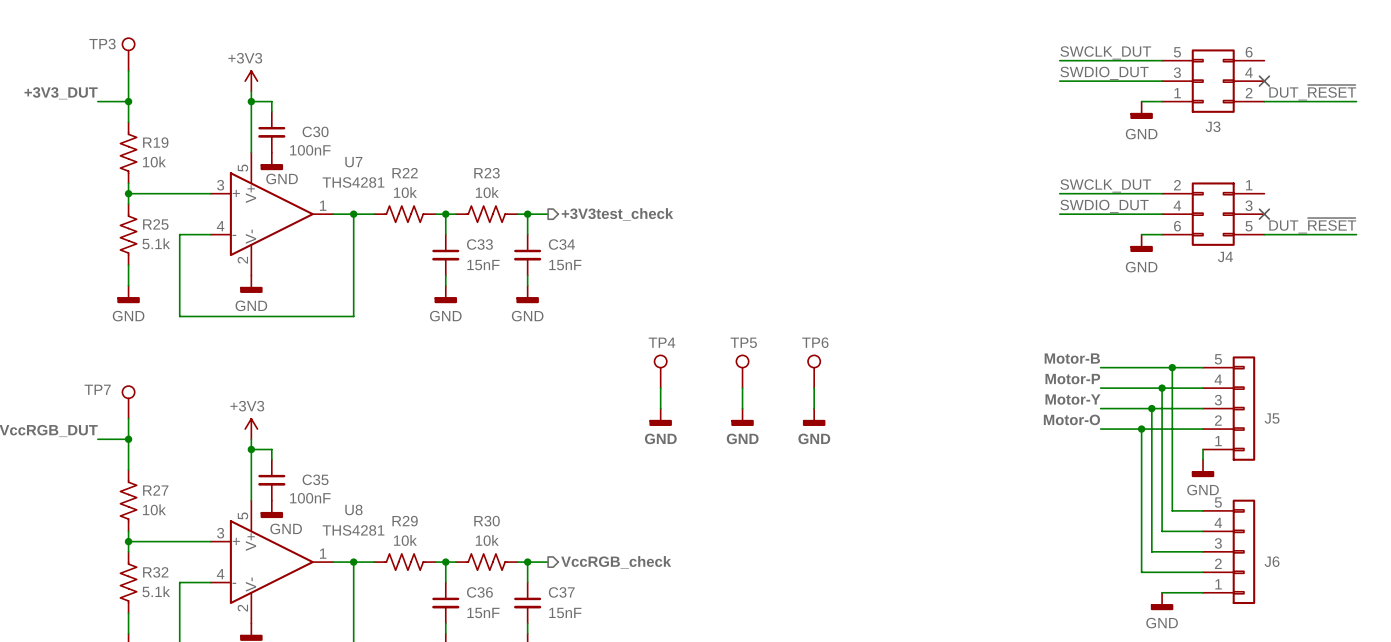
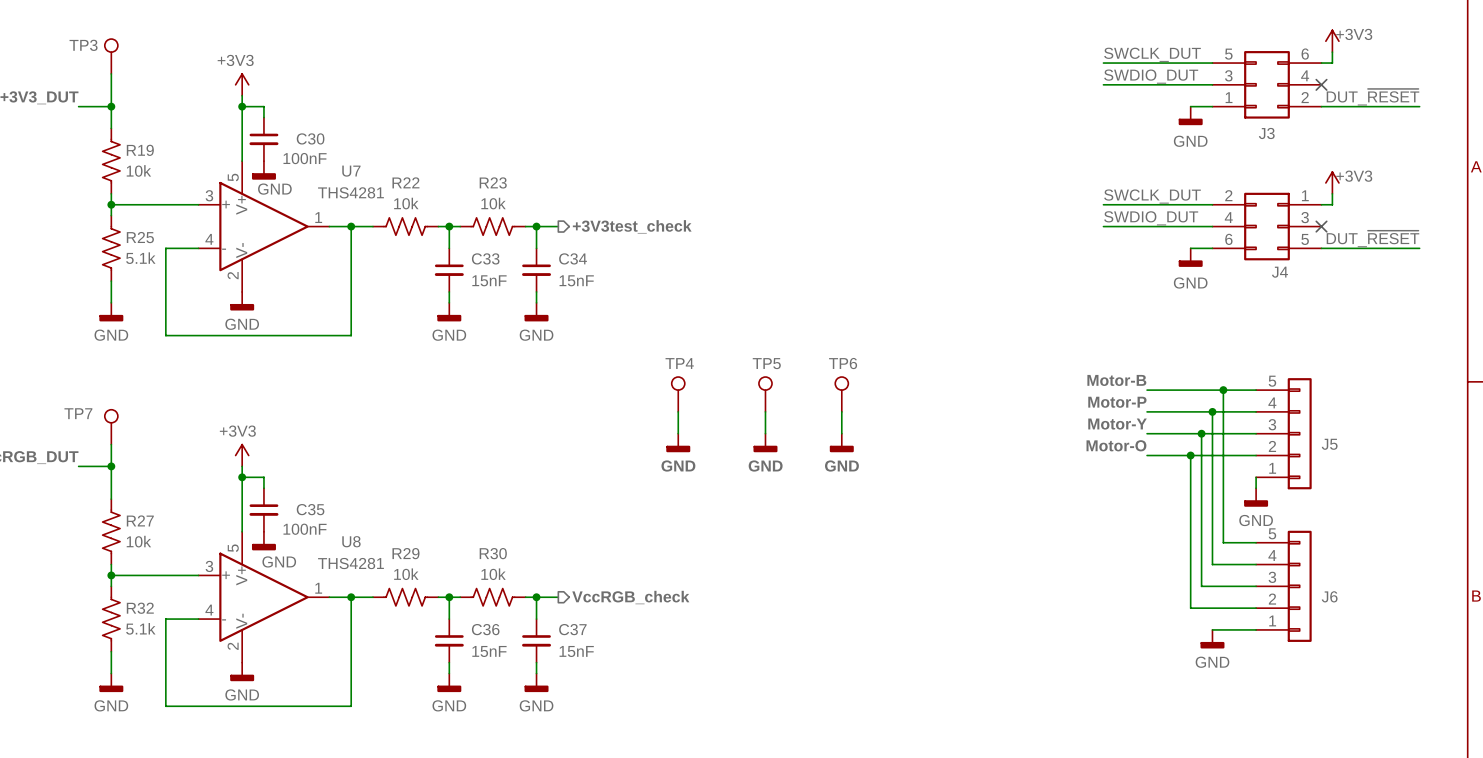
power symbol: none -> +3V3 (1332, 41)
wire: none -> (1332, 52) (1332, 63) (1321, 63)
power symbol: none -> +3V3 (1332, 182)
wire: none -> (1332, 193) (1332, 204) (1321, 204)

